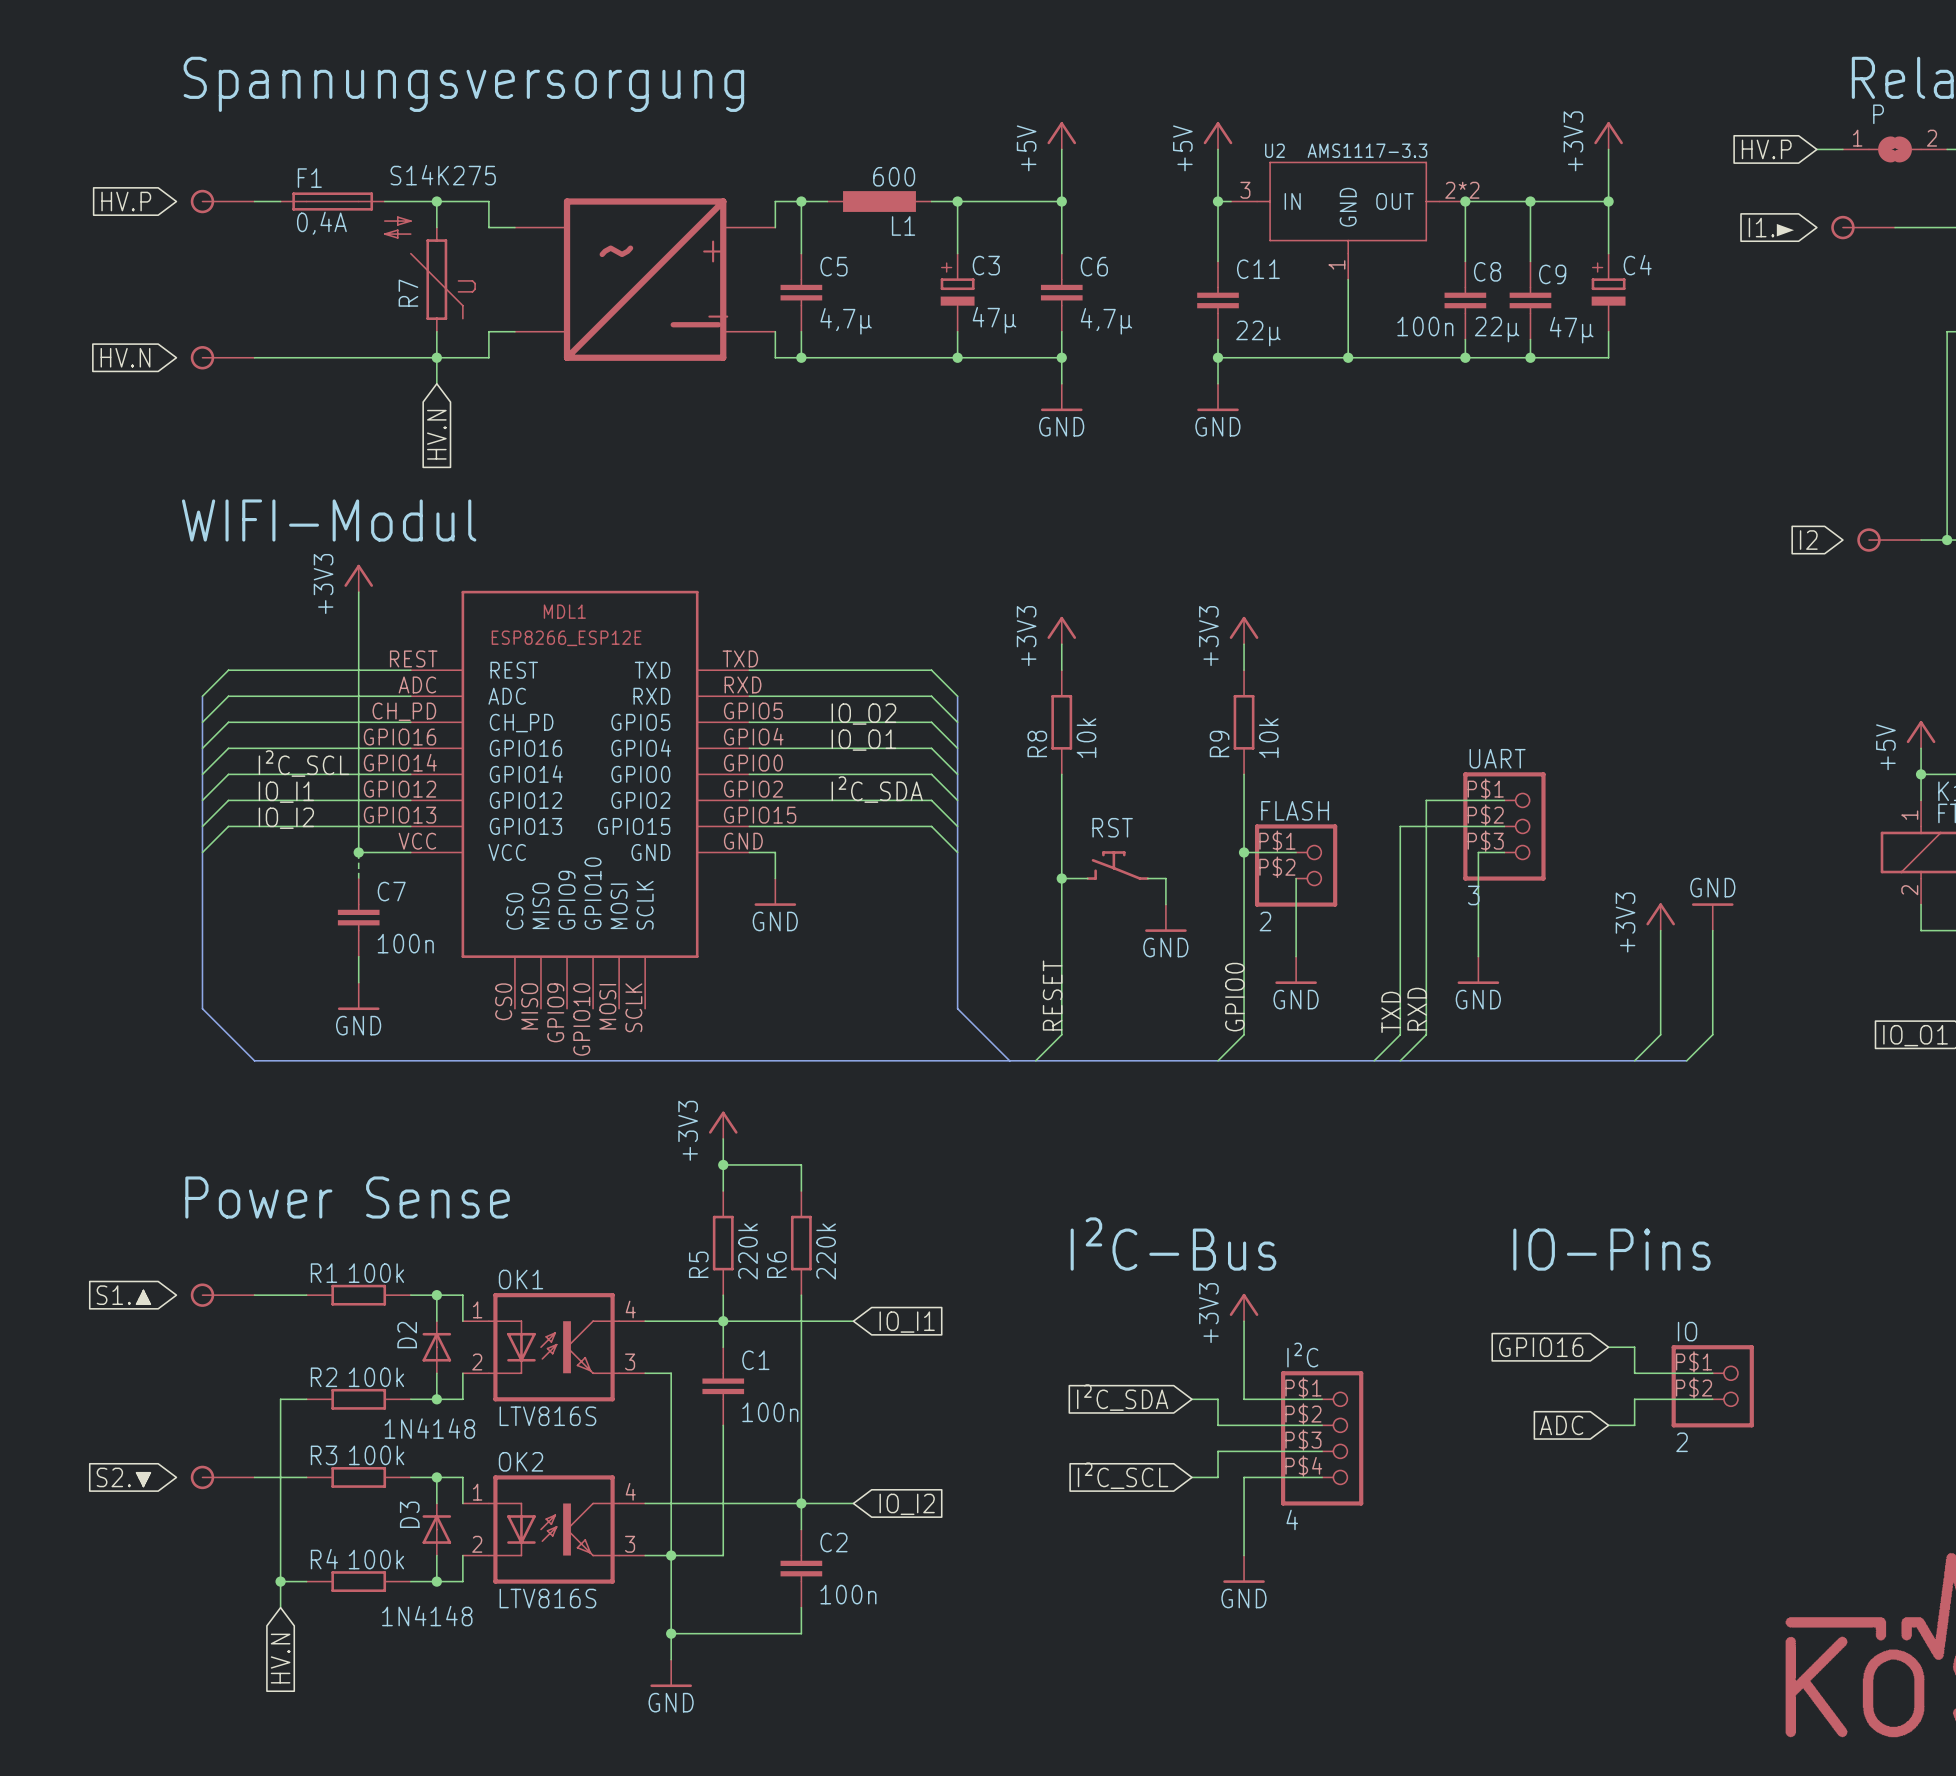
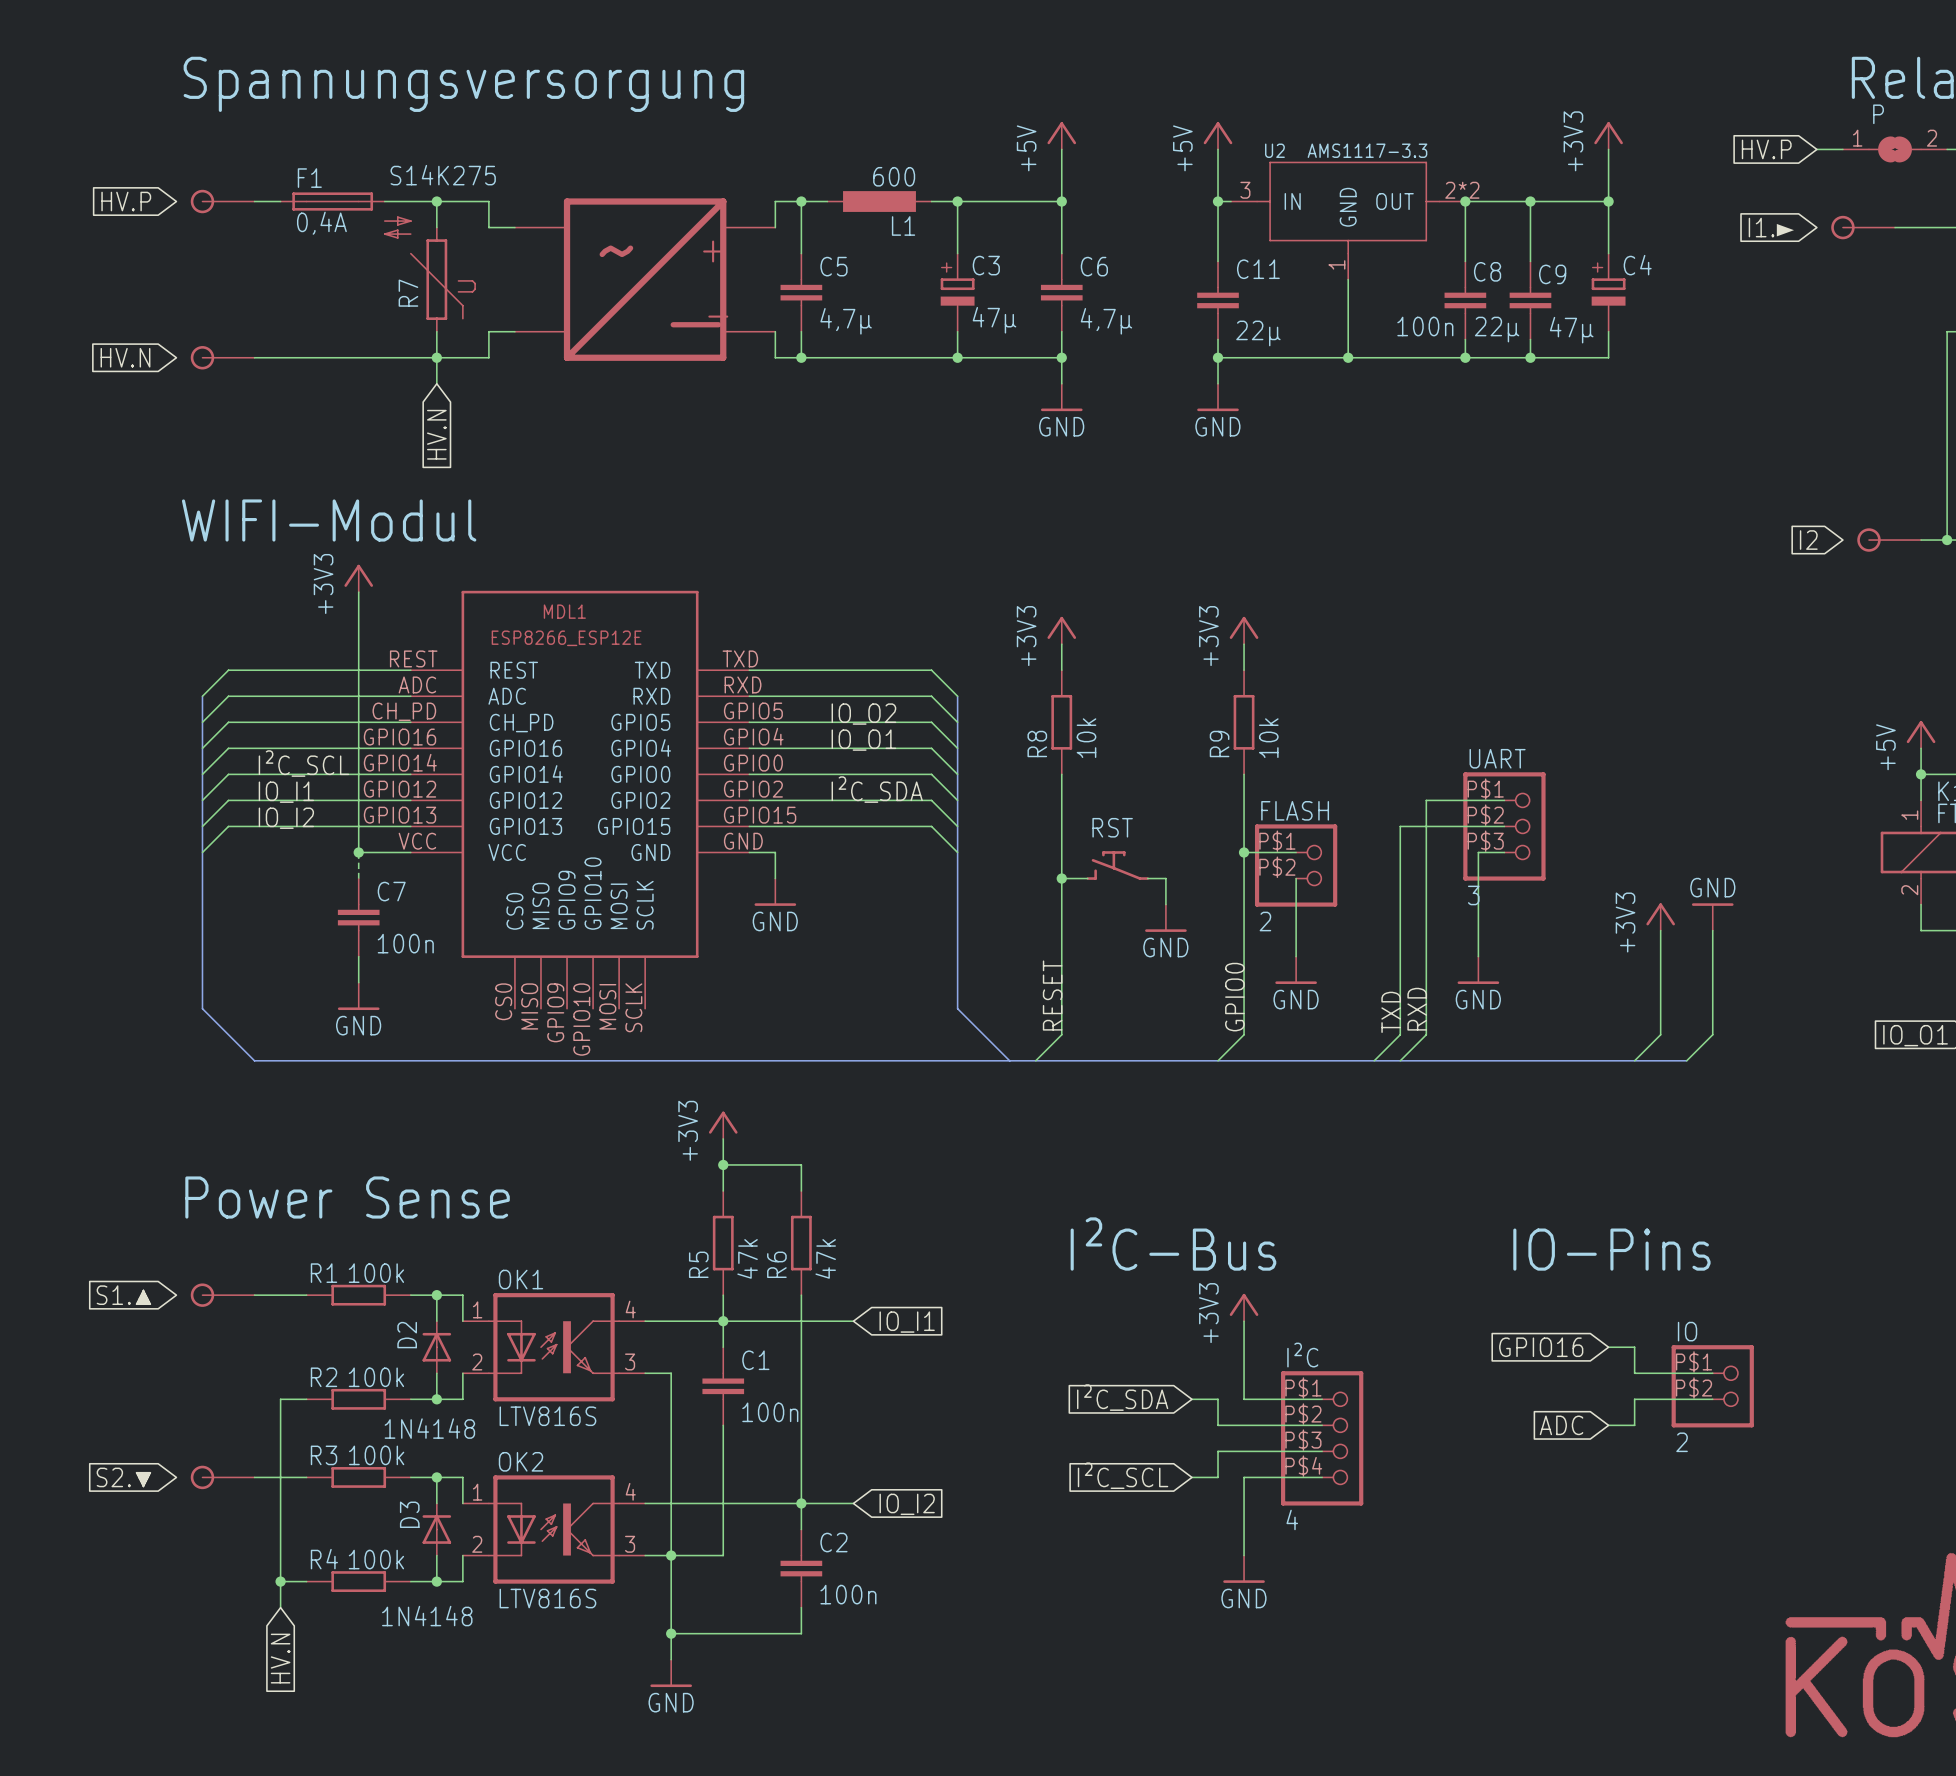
R5 value: 220k (748, 1251) -> 47k (747, 1258)
R6 value: 220k (826, 1251) -> 47k (825, 1258)

